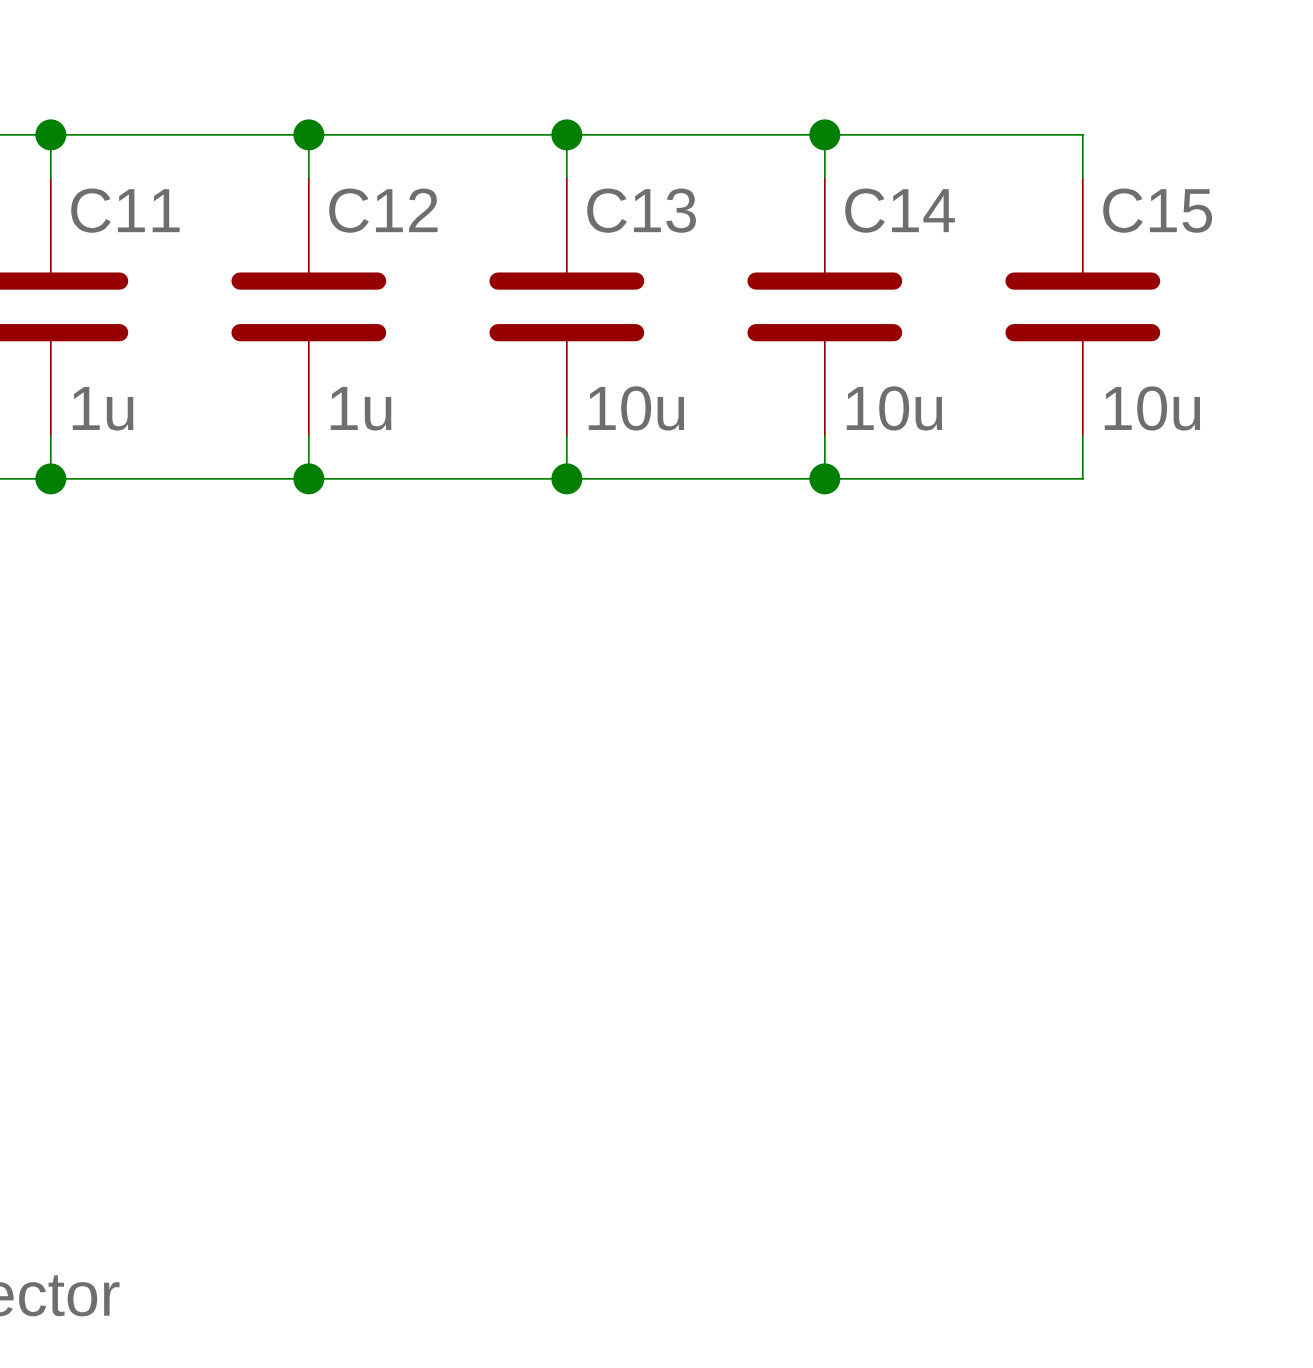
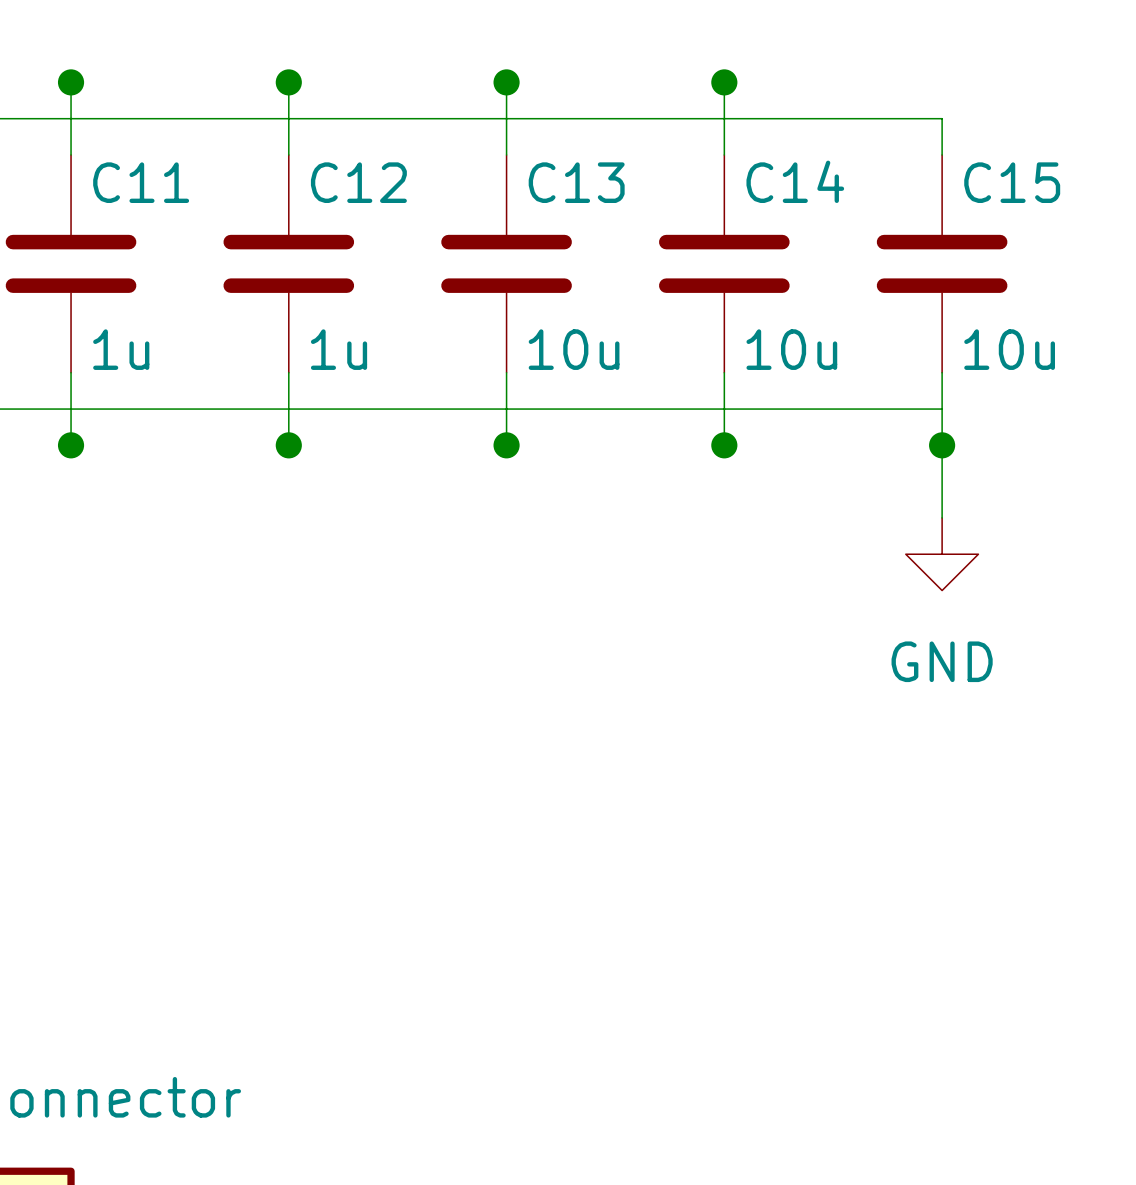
wire: none -> (71, 82) (71, 118)
wire: none -> (288, 82) (288, 118)
wire: none -> (506, 82) (506, 118)
wire: none -> (724, 82) (724, 118)
junction position: (50, 134) -> (71, 82)
junction position: (308, 134) -> (288, 82)
junction position: (566, 134) -> (506, 82)
junction position: (824, 134) -> (724, 82)
wire: none -> (71, 409) (71, 445)
junction position: (50, 478) -> (71, 445)
wire: none -> (288, 409) (288, 445)
junction position: (308, 478) -> (288, 445)
wire: none -> (506, 409) (506, 445)
junction position: (566, 478) -> (506, 445)
wire: none -> (724, 409) (724, 445)
junction position: (824, 478) -> (724, 445)
wire: none -> (942, 409) (942, 517)
junction: none -> (942, 445)
power symbol: none -> GND (942, 554)

